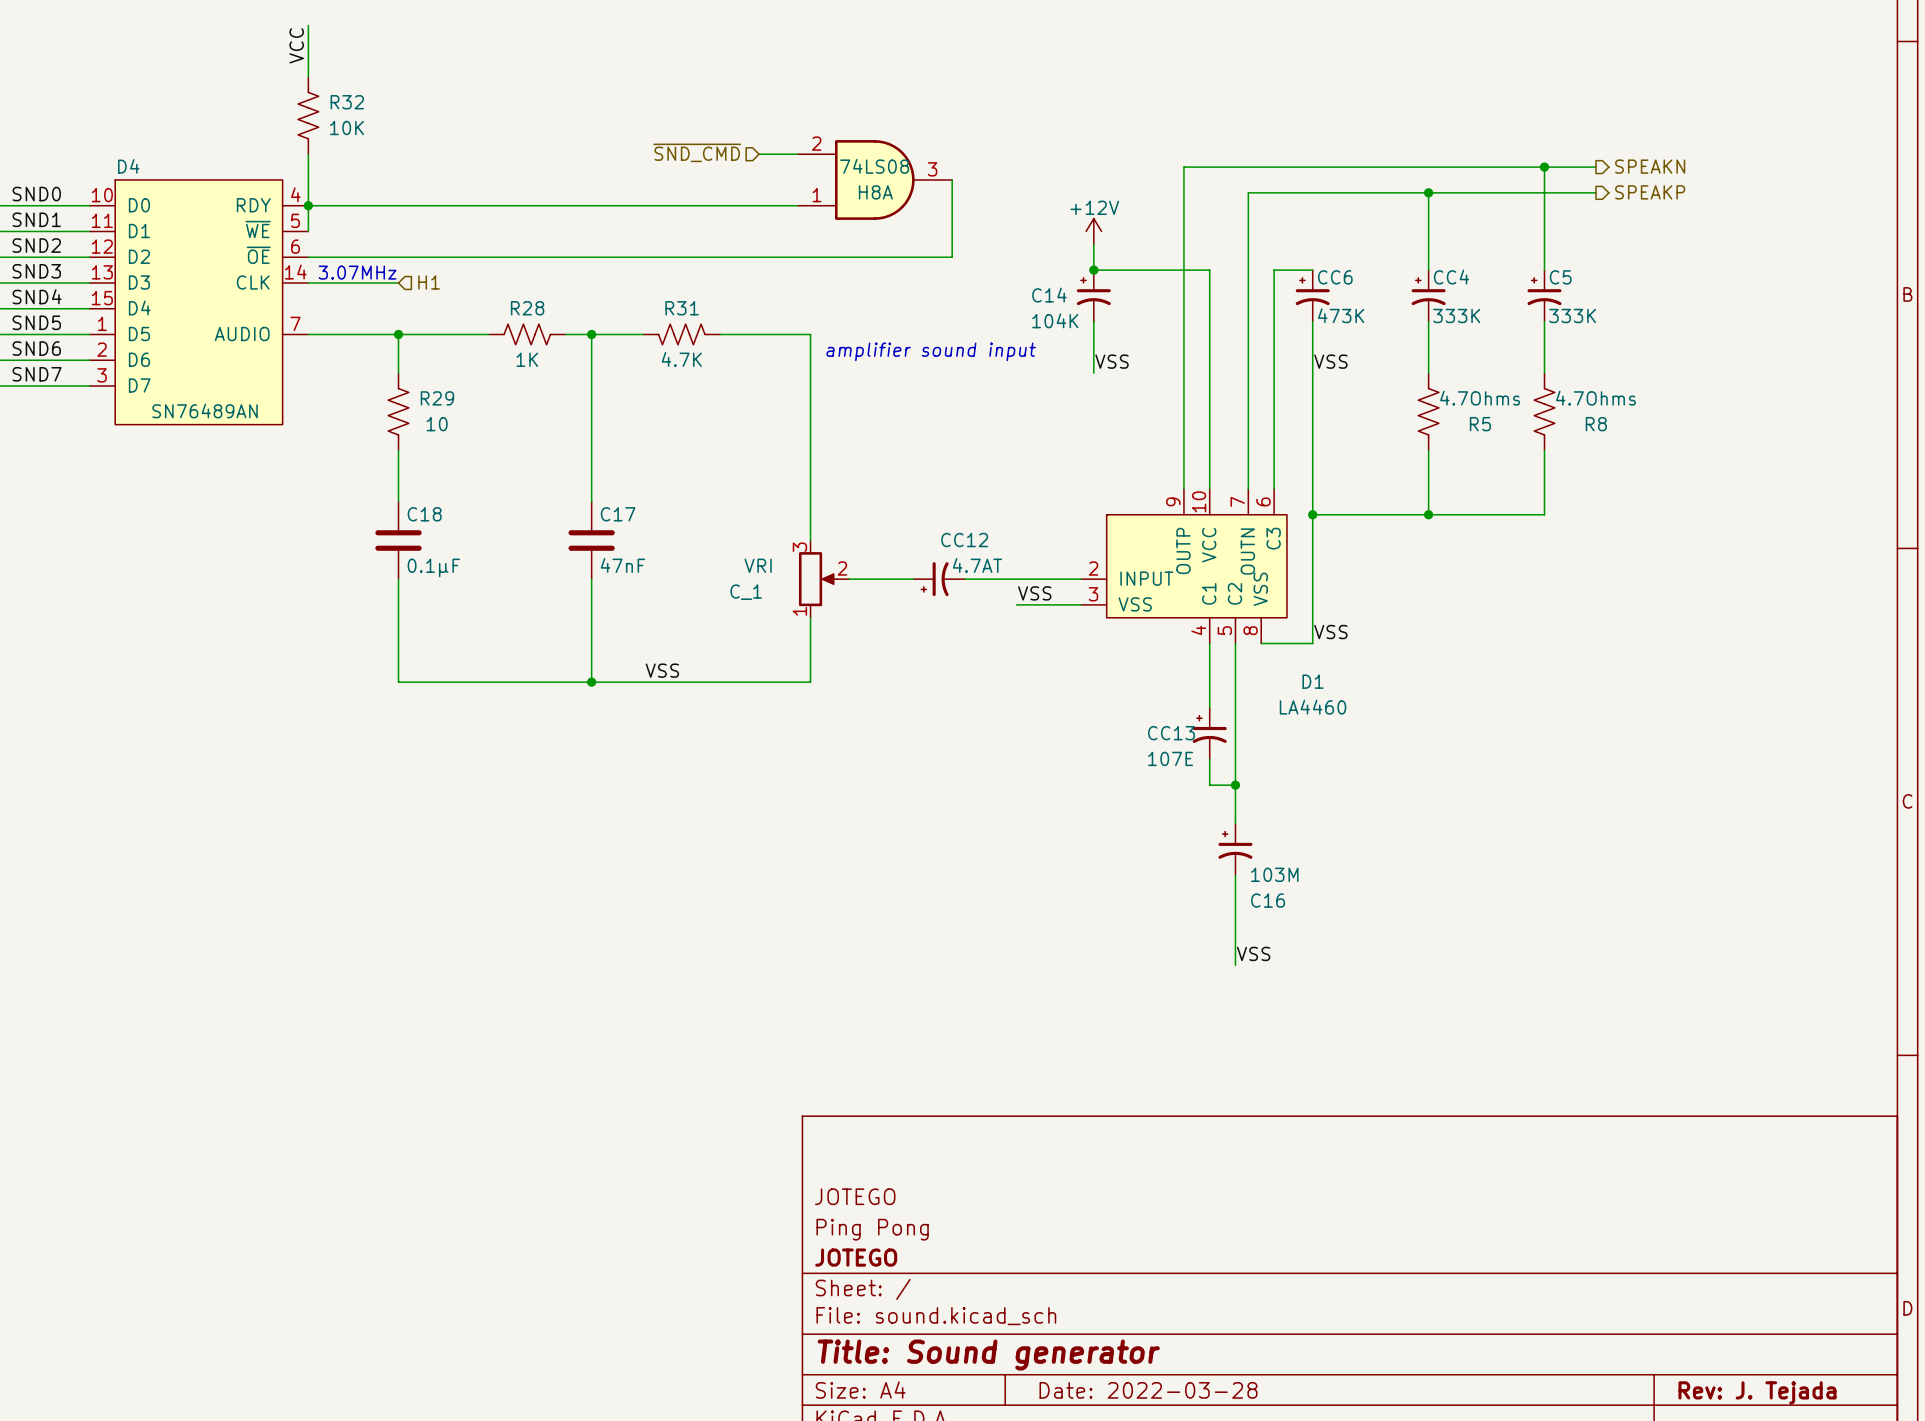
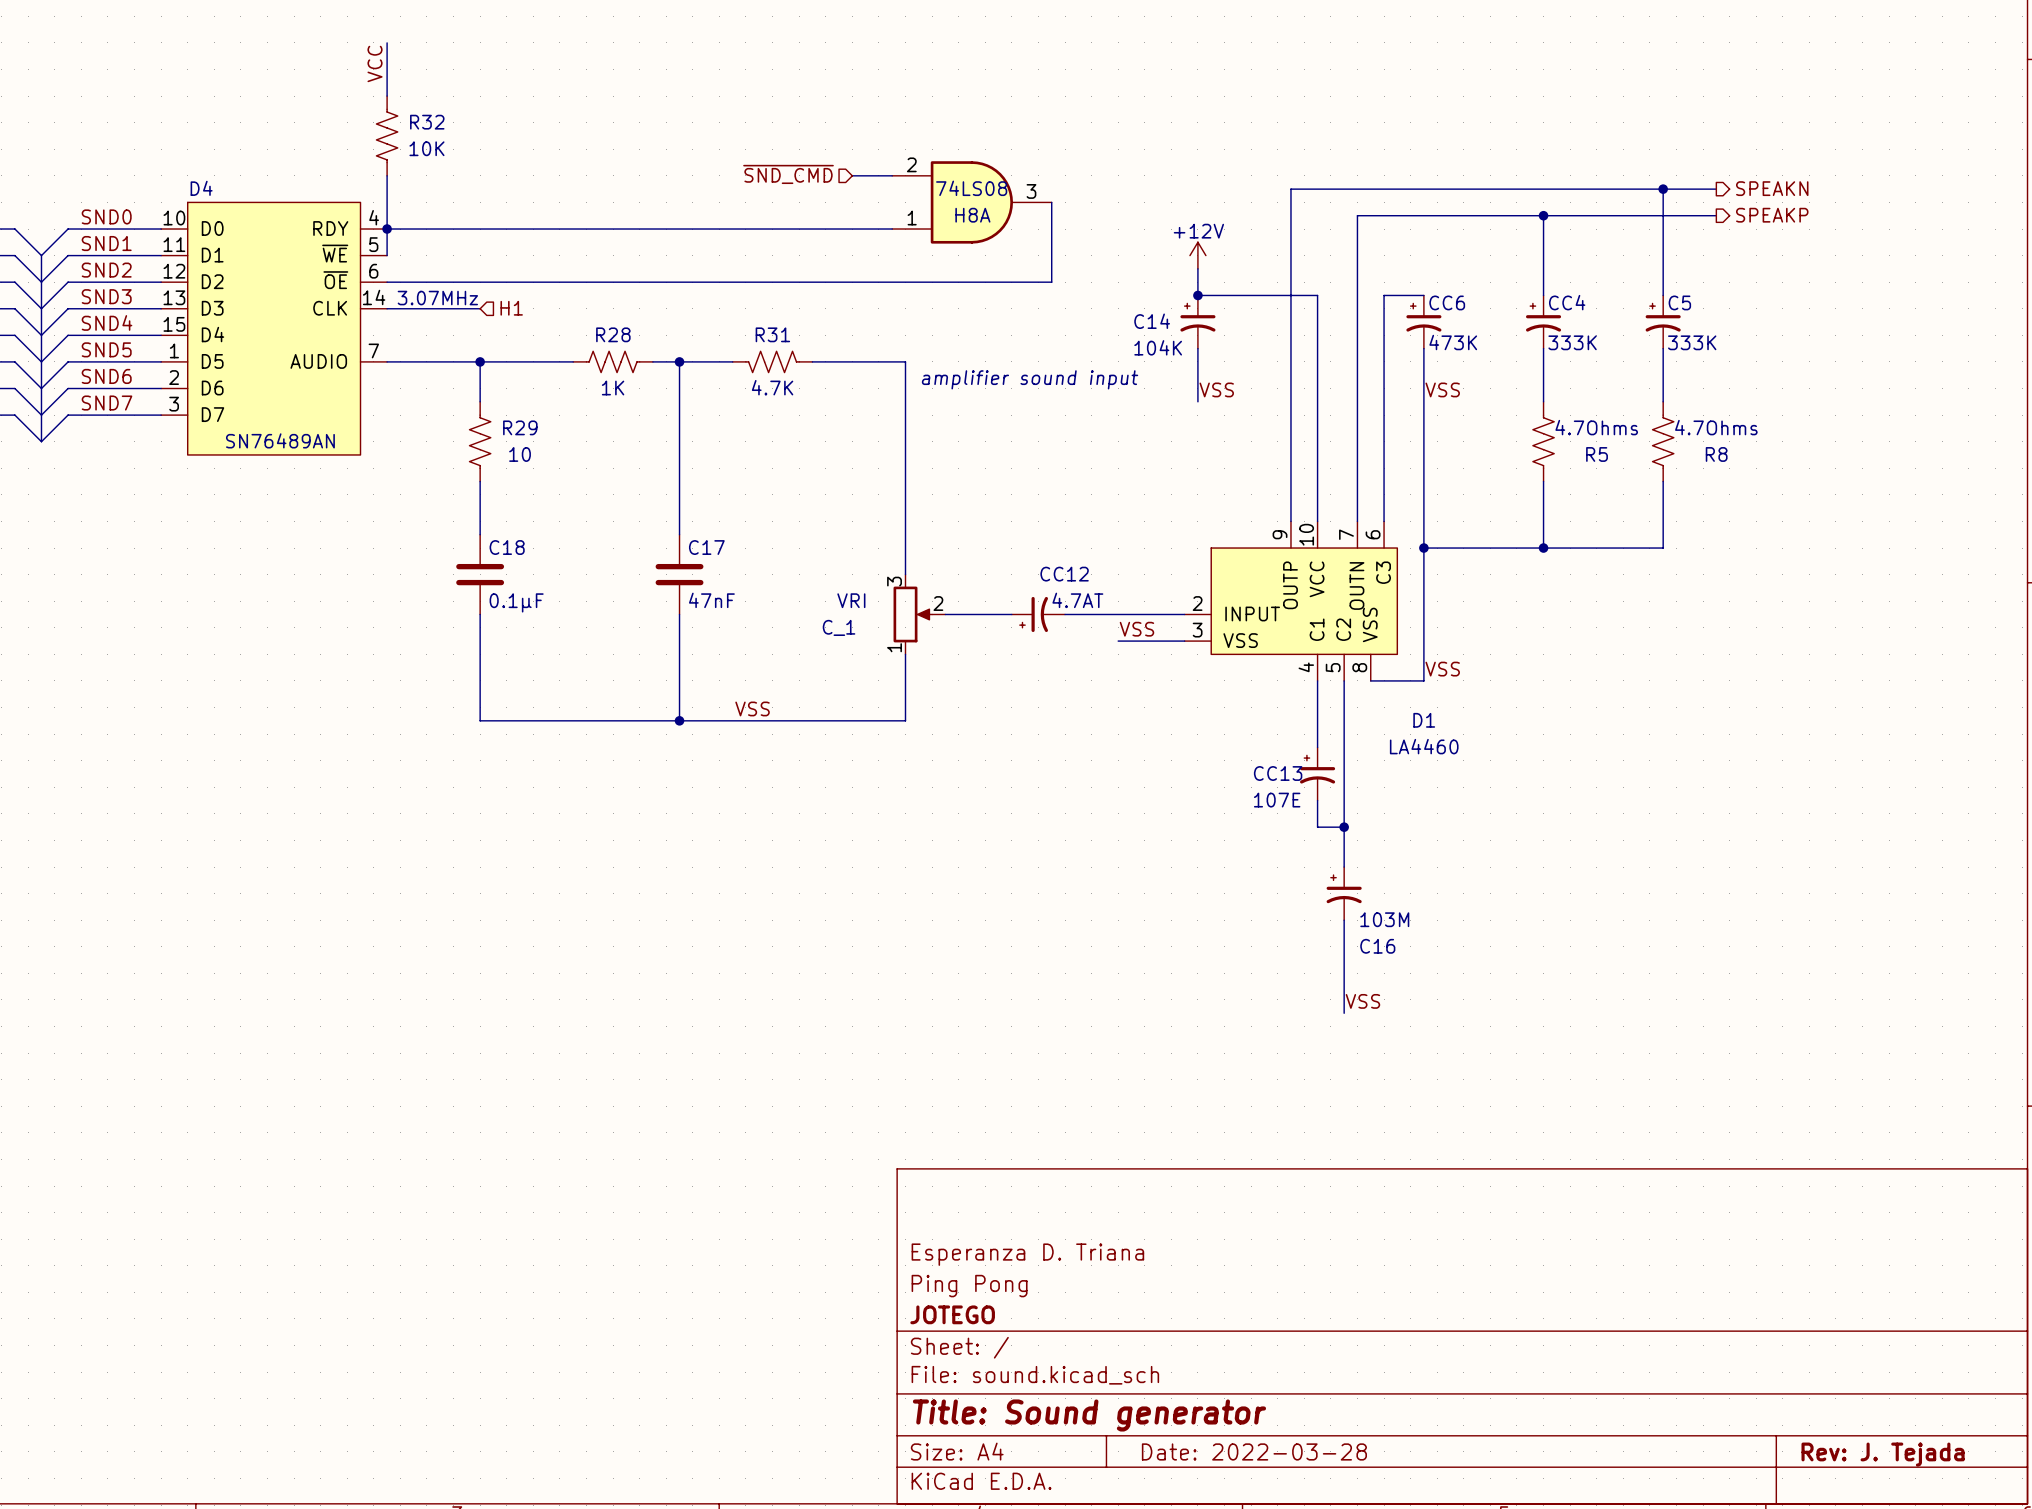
title block: JOTEGO (855, 1196) -> Esperanza D. Triana (1027, 1254)

